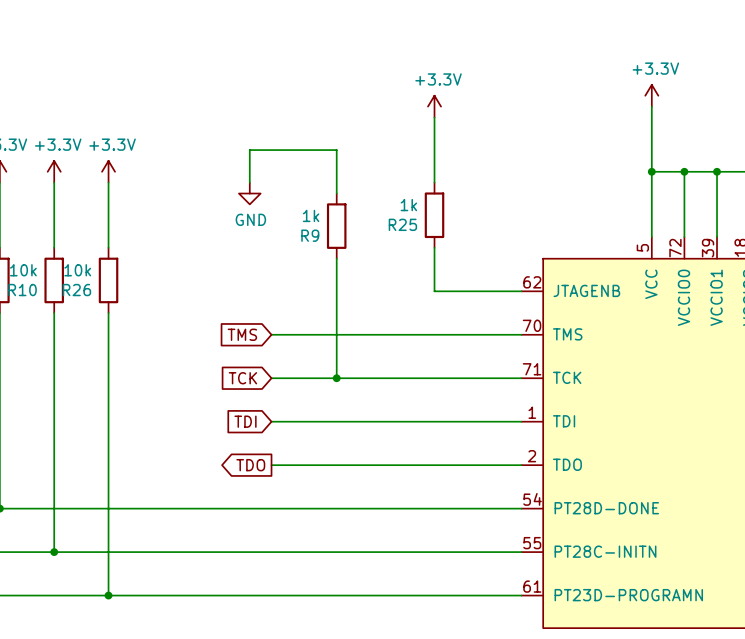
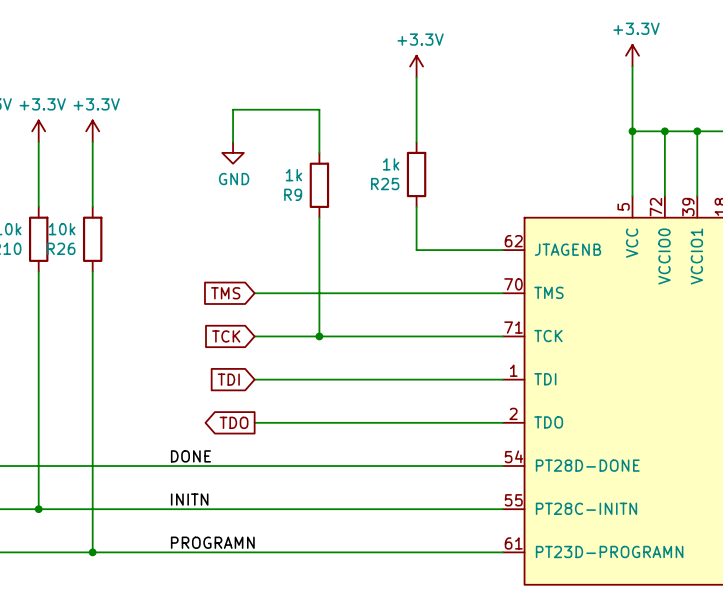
label: none -> DONE (190, 456)
label: none -> INITN (189, 499)
label: none -> PROGRAMN (212, 542)

